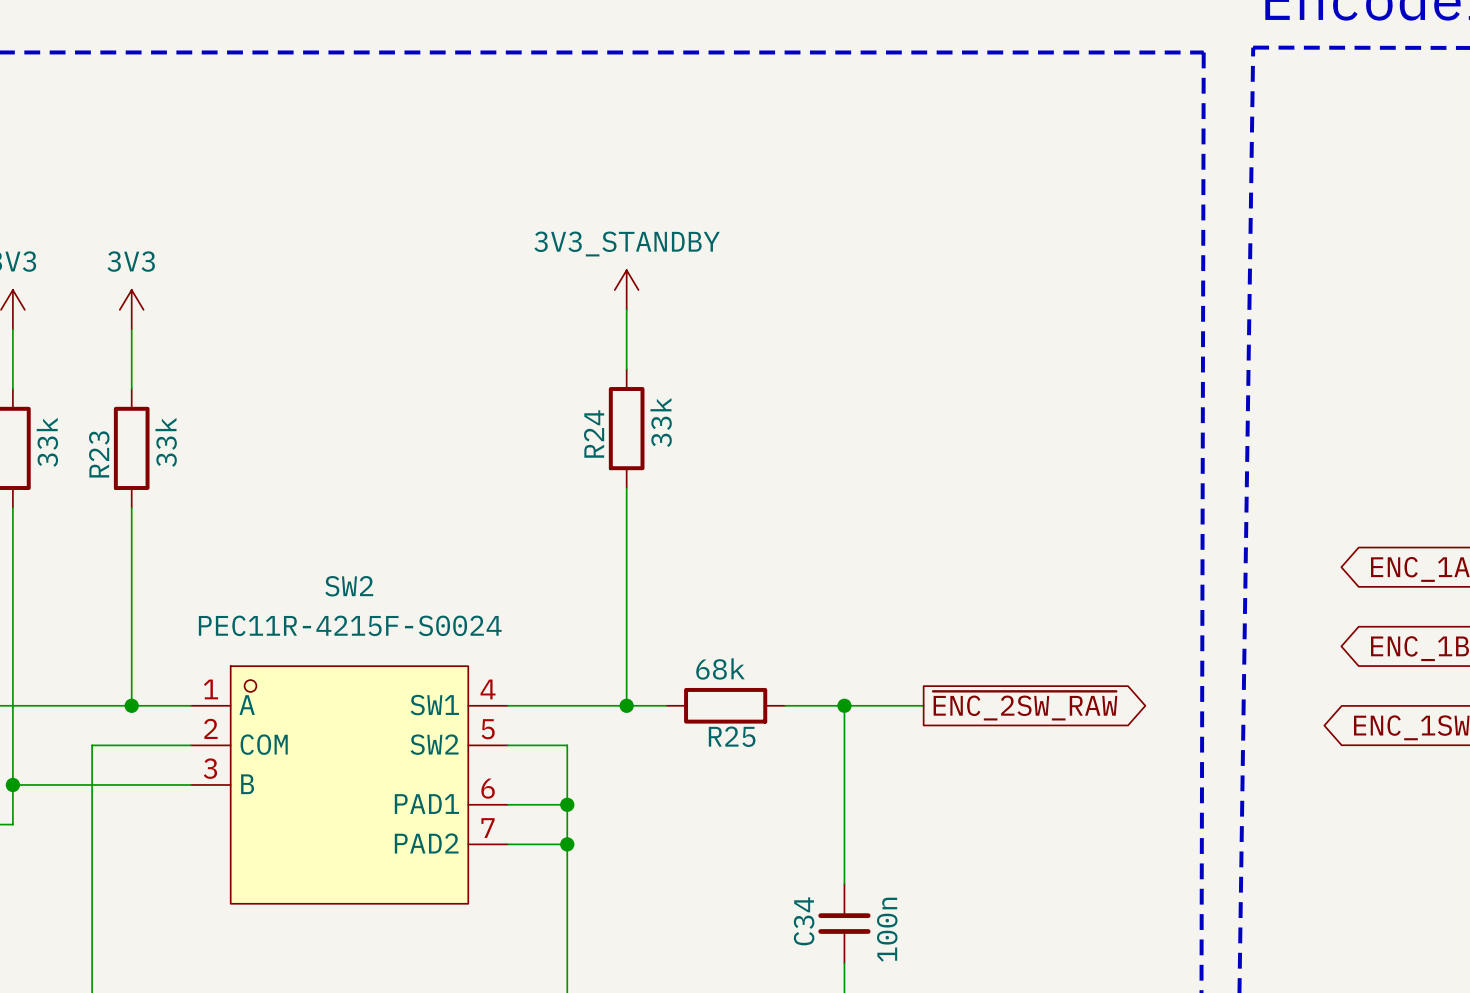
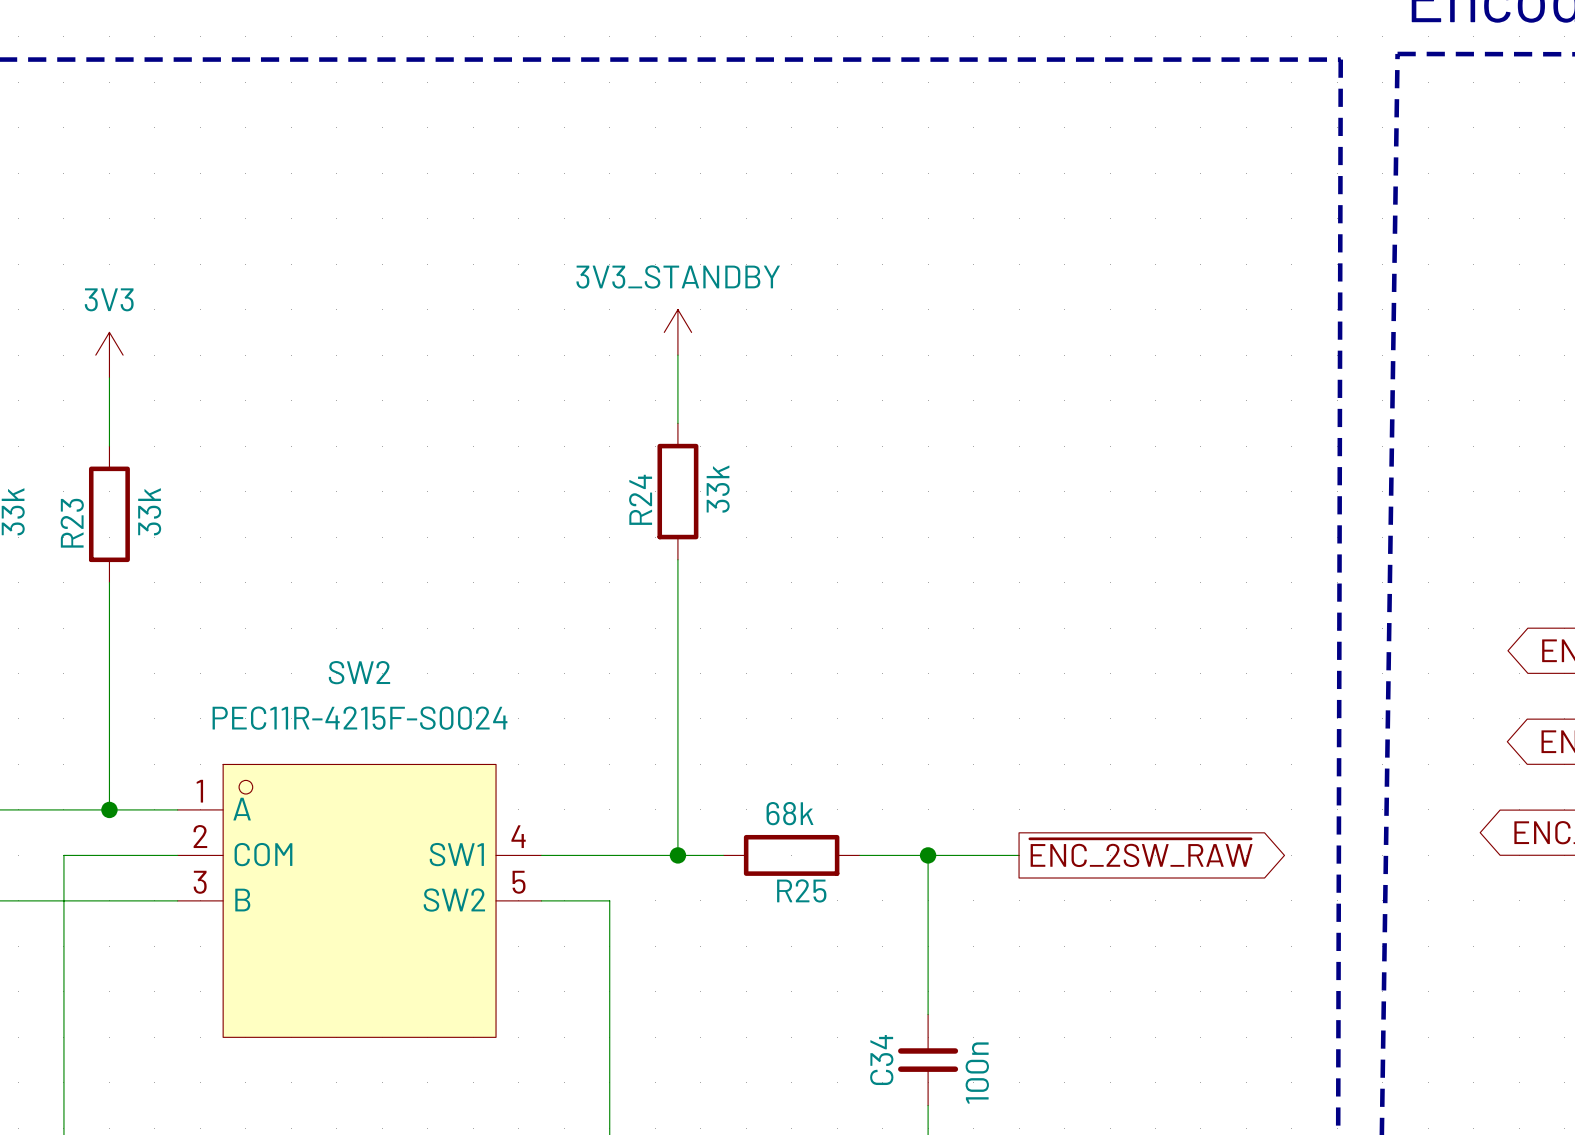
SW2 symbol: [191, 666, 508, 904] -> [177, 764, 542, 1038]
wire: (507, 705) (666, 705) -> none
junction position: (626, 705) -> (677, 855)
R25 position: (725, 705) -> (791, 855)
wire: (785, 705) (923, 705) -> (859, 855) (1019, 855)
wire: (844, 705) (844, 745) -> (677, 809) (677, 855)
junction position: (844, 705) -> (928, 855)
global label position: ~{ENC_2SW_RAW} (1025, 705) -> ~{ENC_2SW_RAW} (1141, 852)
wire: (567, 745) (567, 784) -> (541, 900) (609, 900)
wire: none -> (609, 855) (723, 855)
wire: (507, 804) (567, 804) -> none
junction: (567, 804) -> none
wire: (507, 844) (567, 844) -> none
junction: (567, 844) -> none

